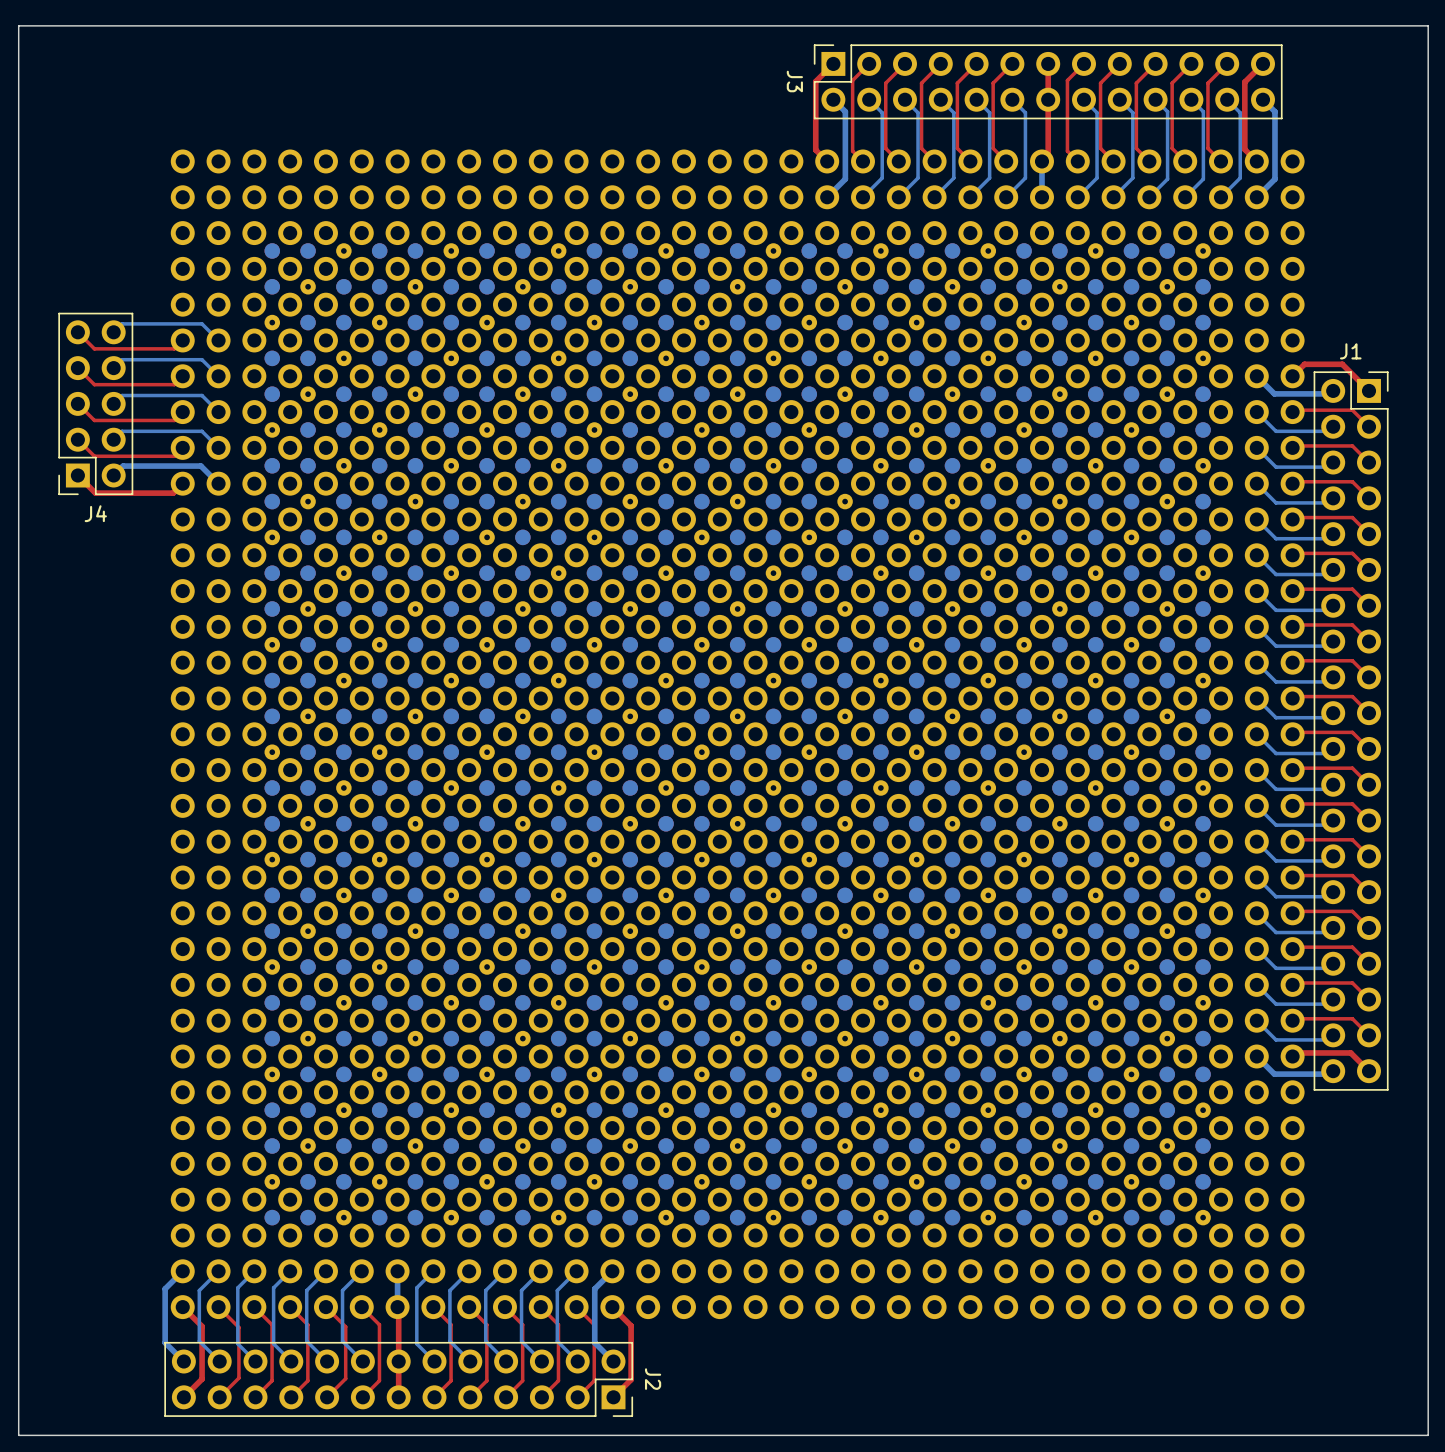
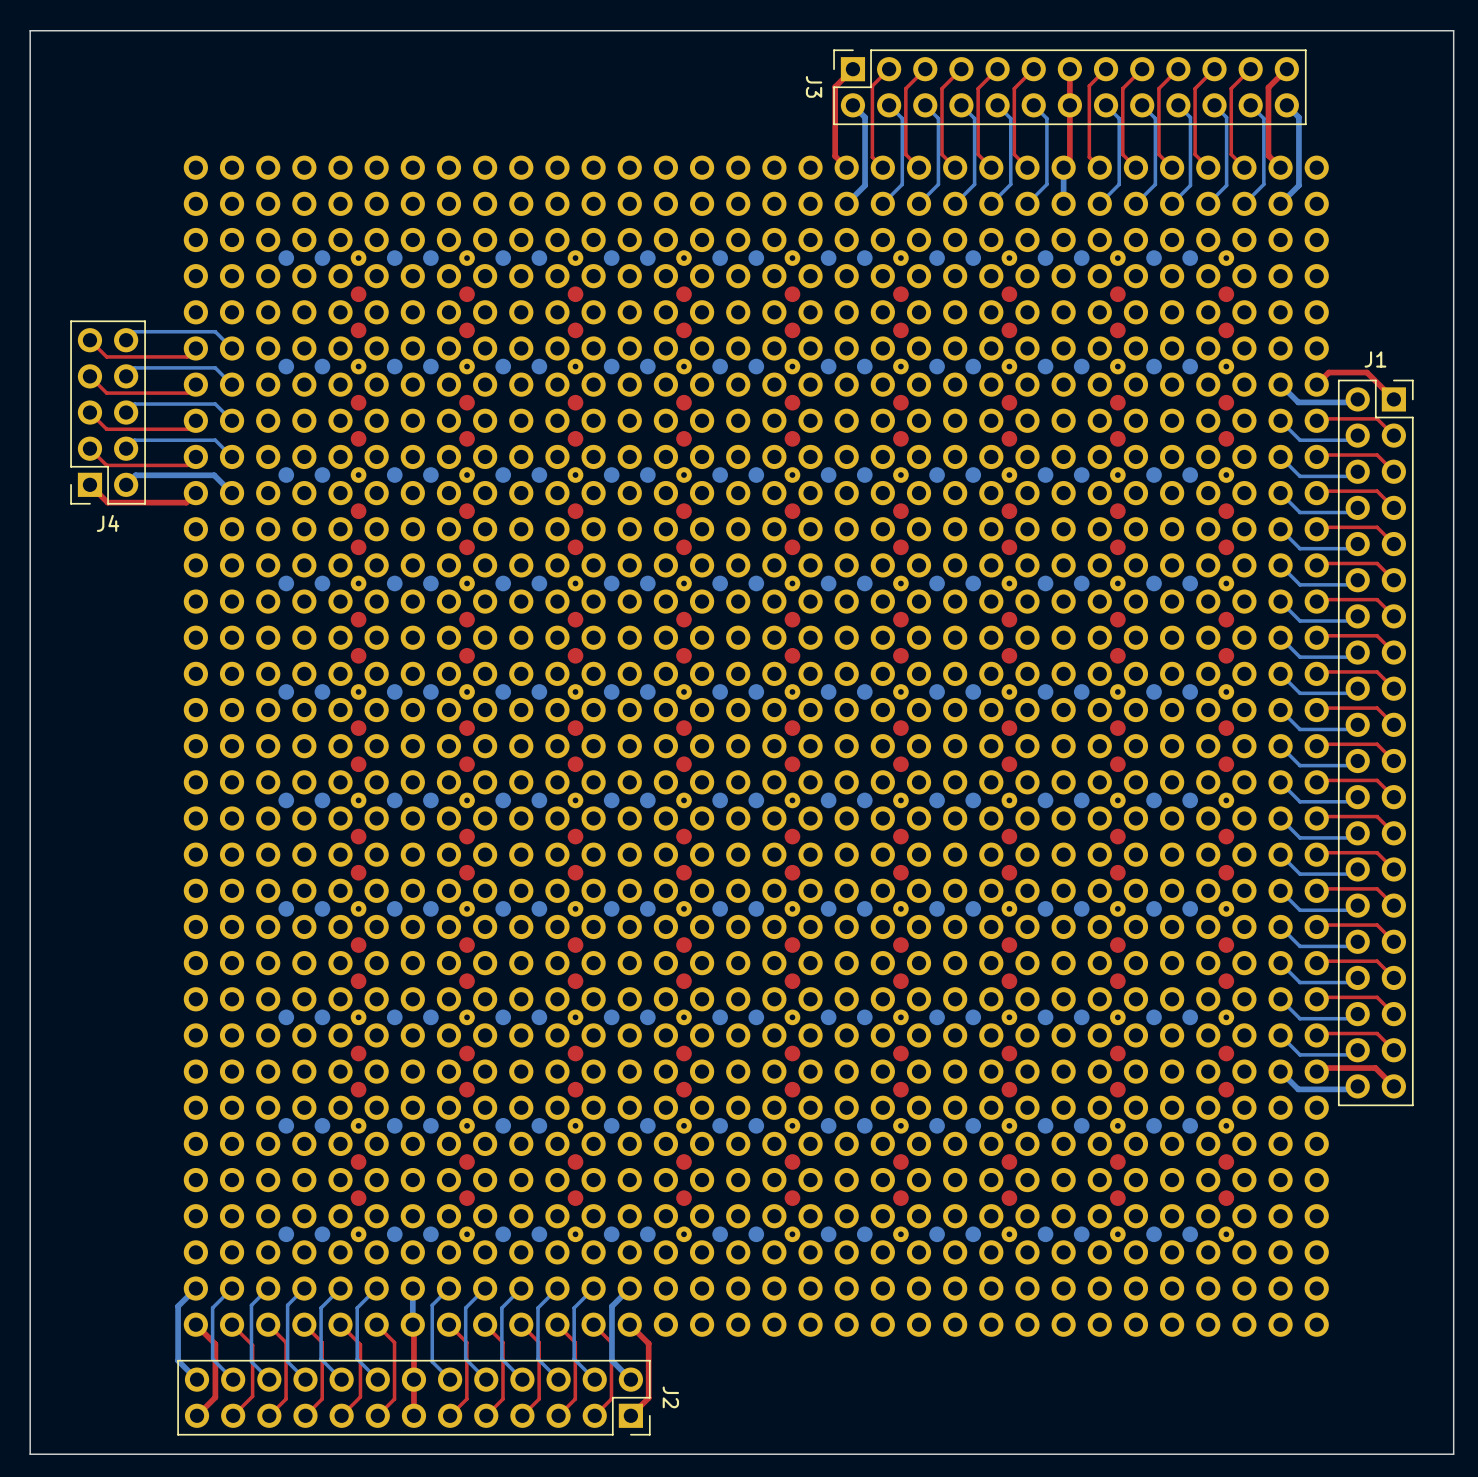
part footprint: [170, 149, 1305, 1320] -> [183, 155, 1329, 1337]

